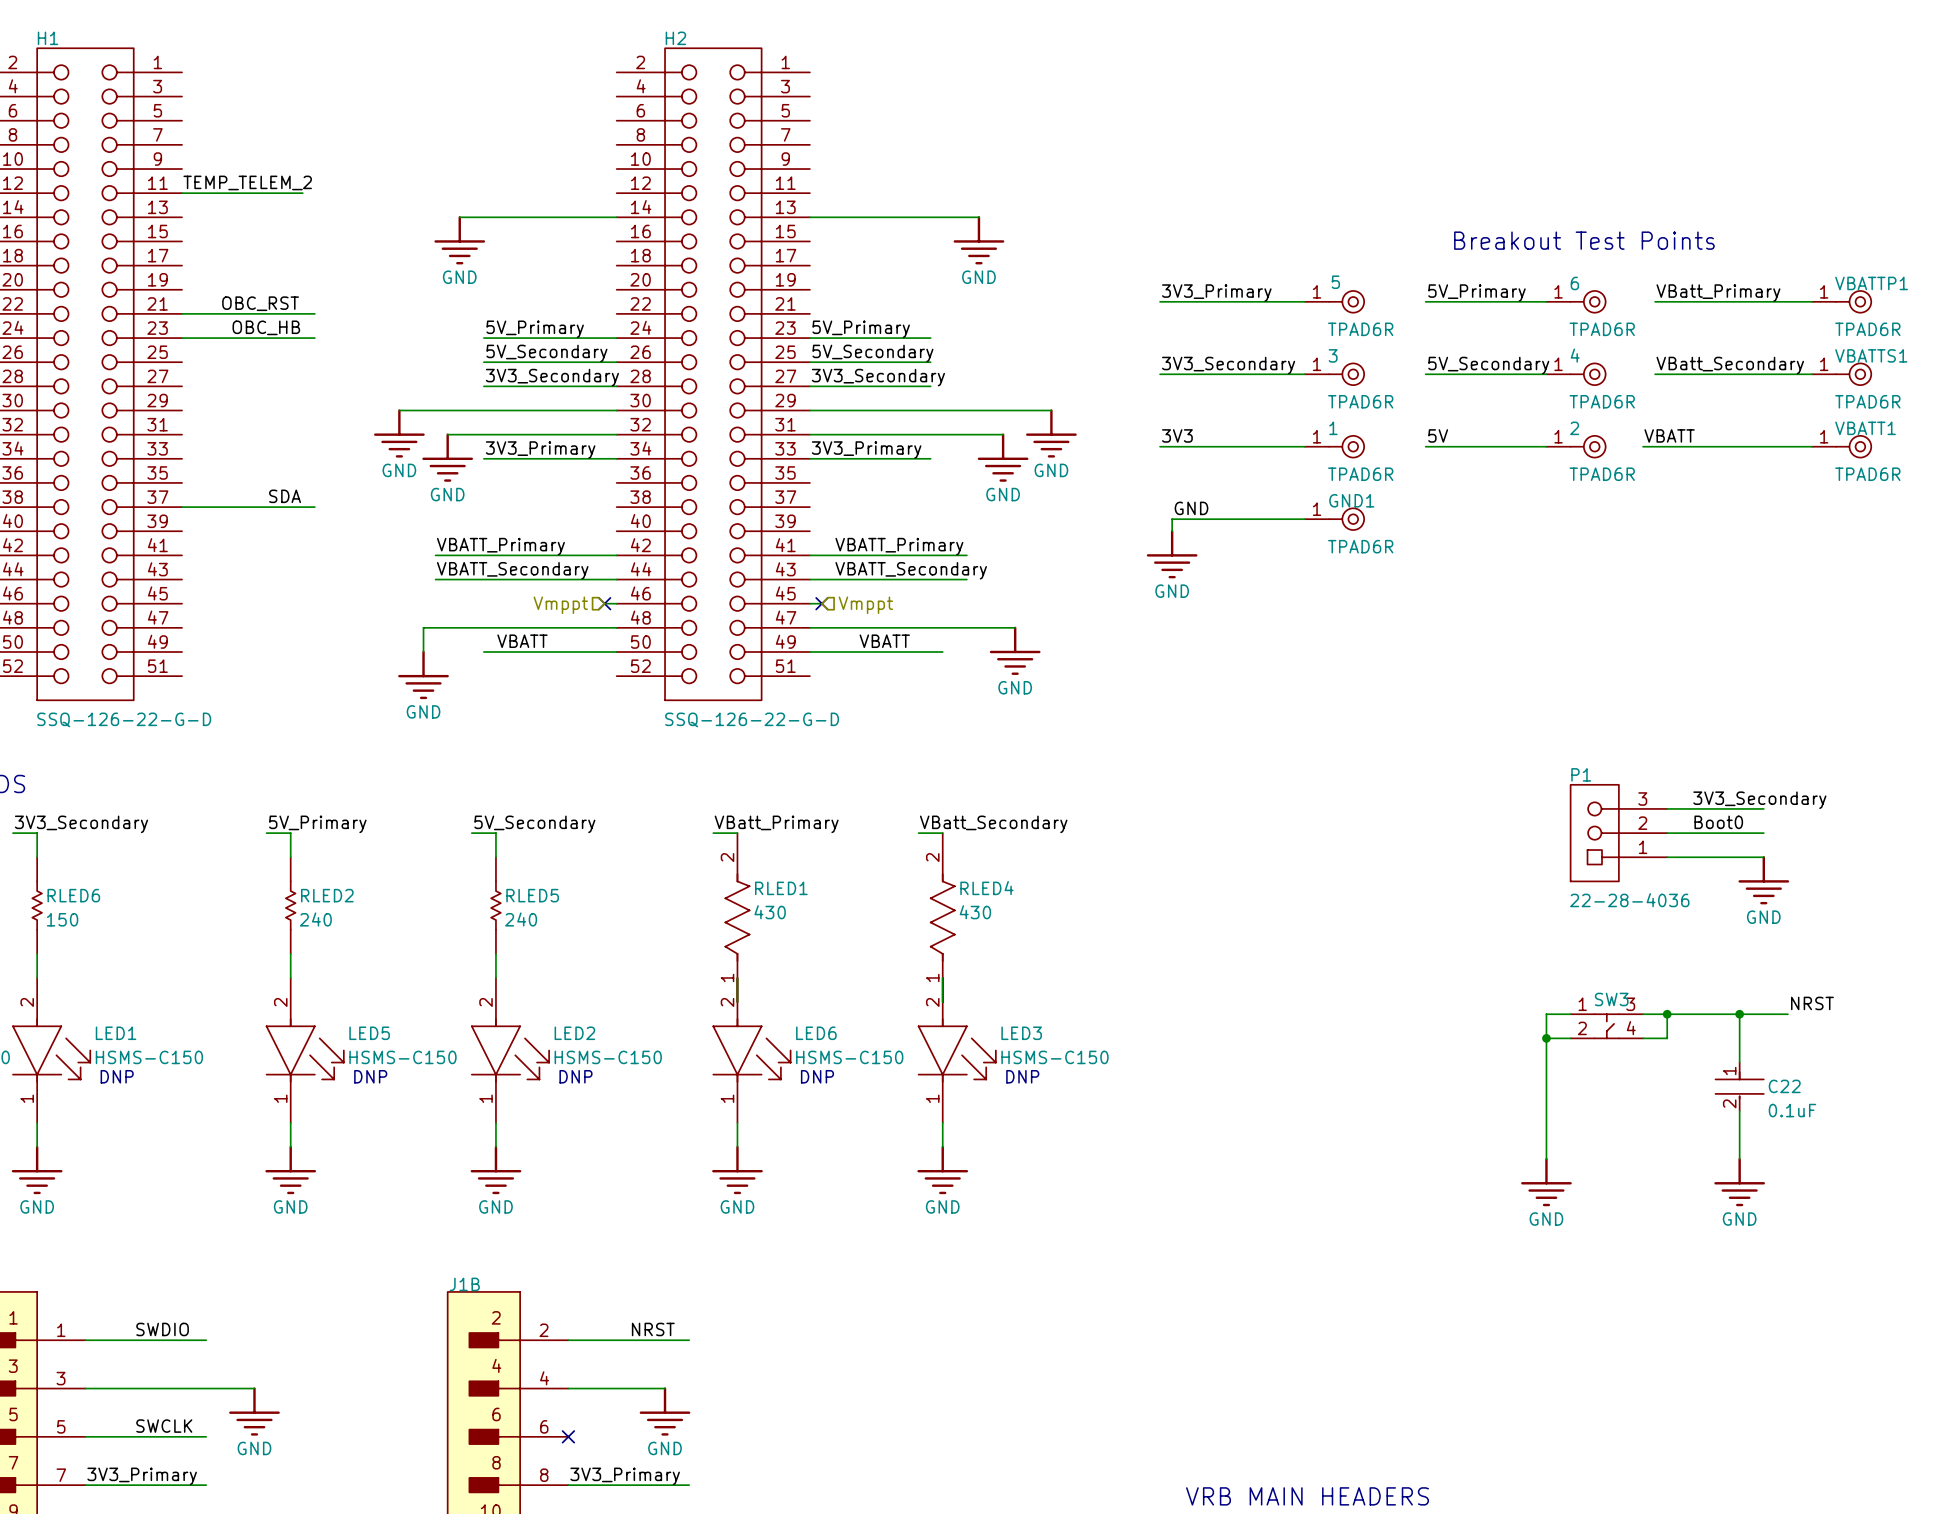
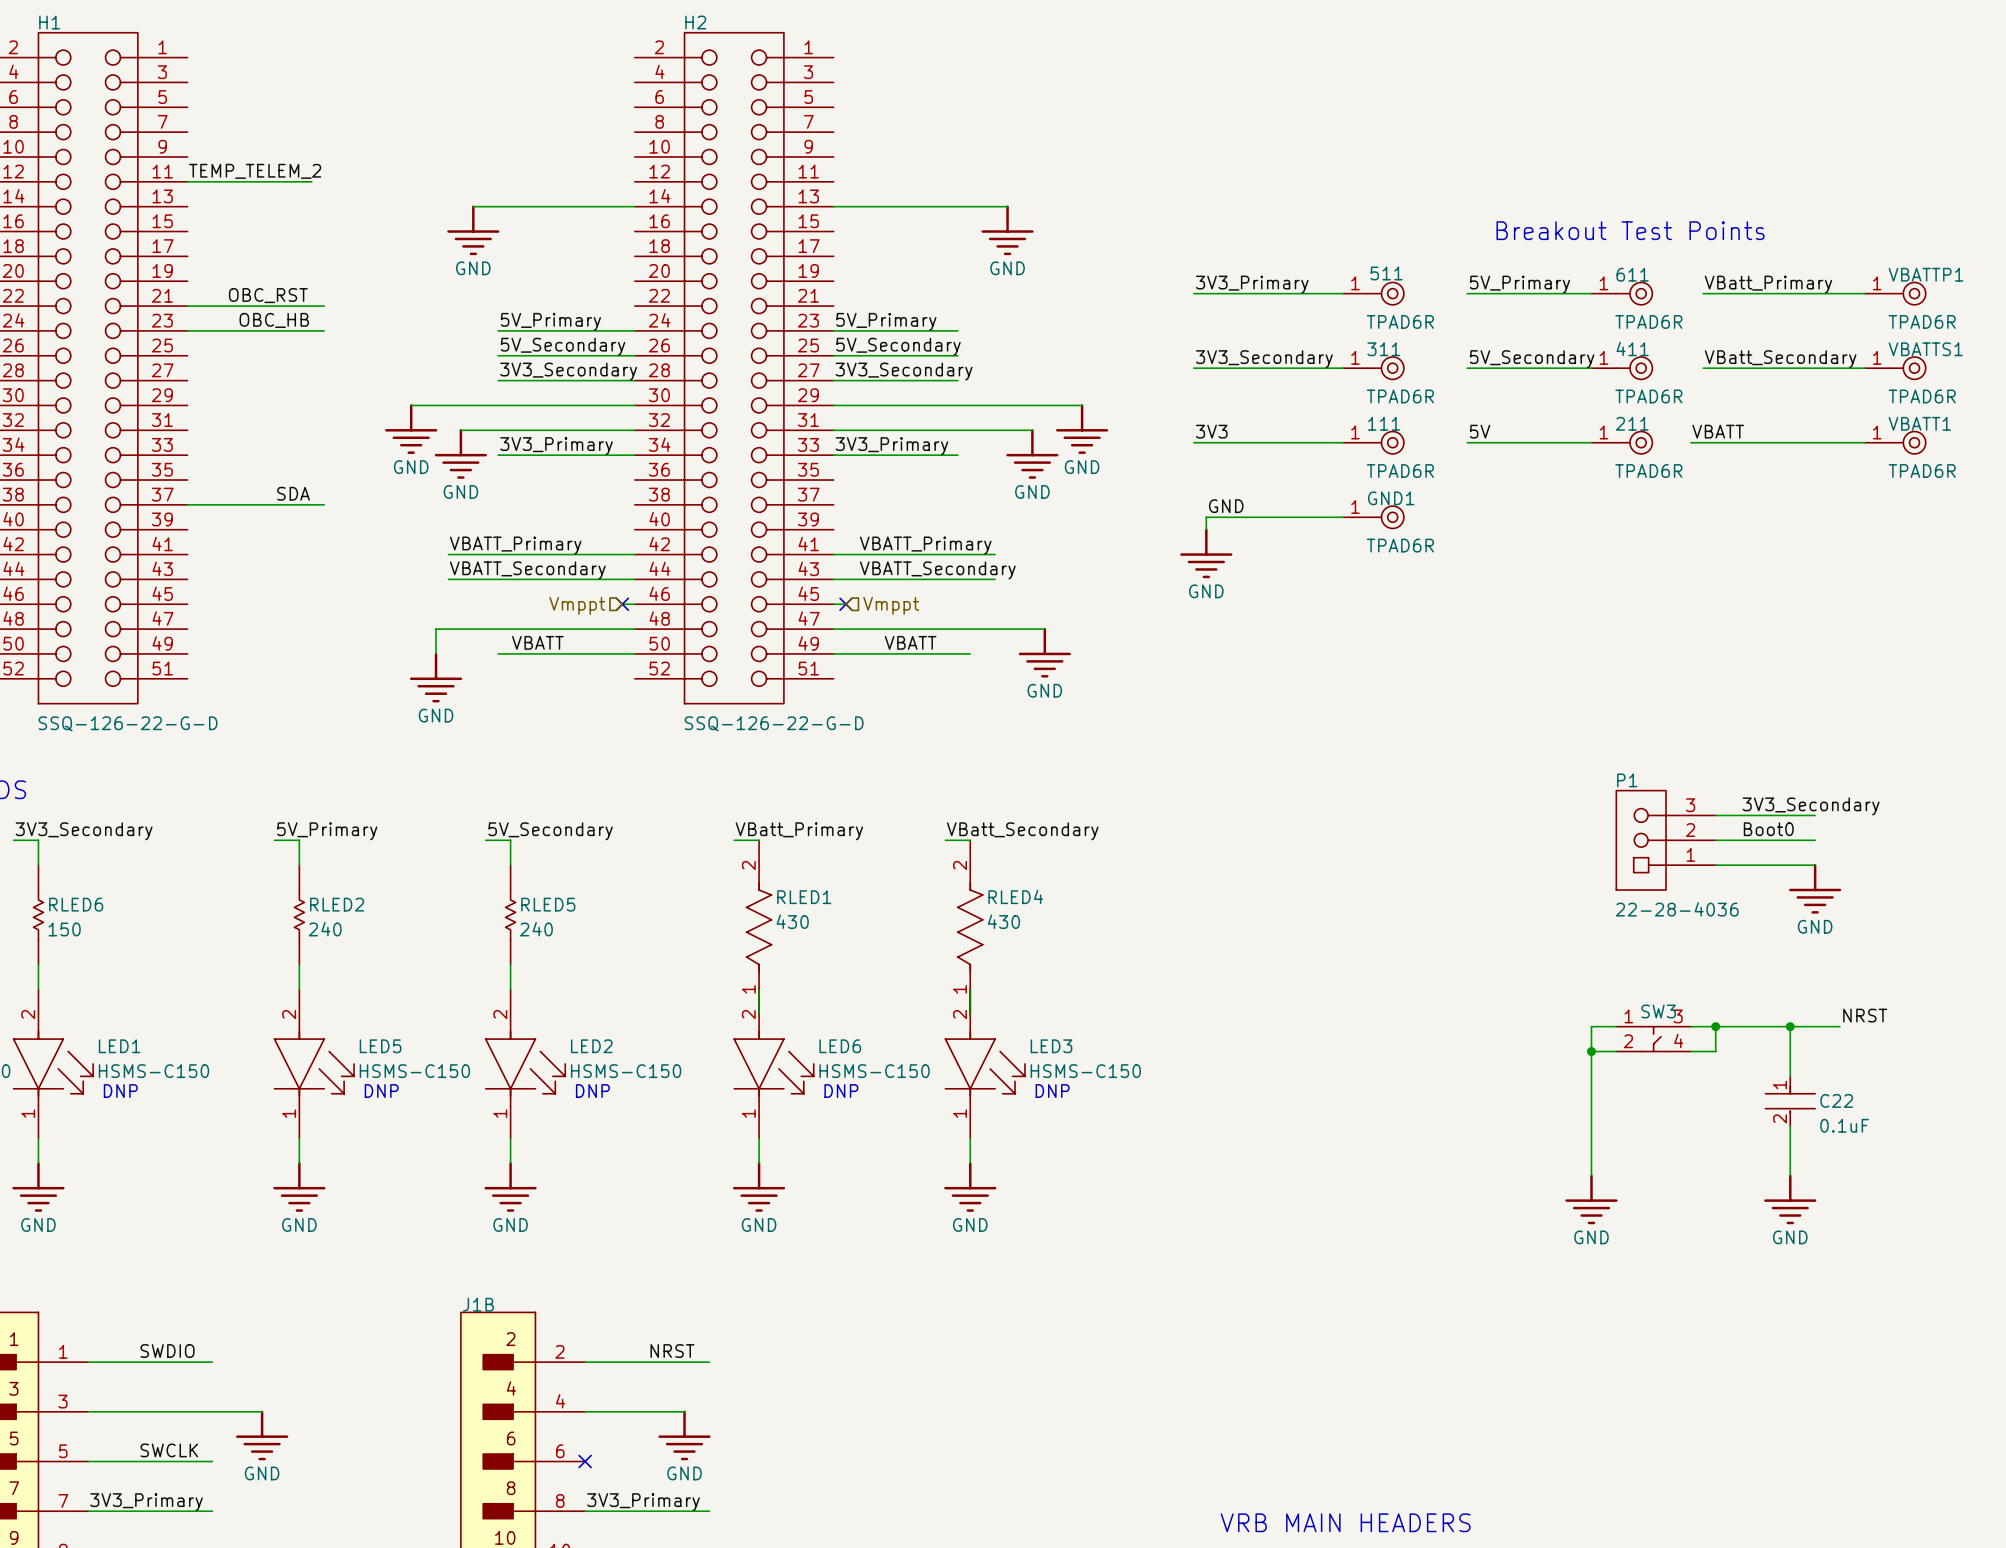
5 name: 5 (1335, 282) -> 511 (1386, 273)
6 name: 6 (1574, 283) -> 611 (1632, 274)
3 name: 3 (1333, 355) -> 311 (1383, 349)
4 name: 4 (1575, 355) -> 411 (1632, 348)
1 name: 1 (1333, 428) -> 111 (1384, 423)
2 name: 2 (1574, 428) -> 211 (1632, 423)

